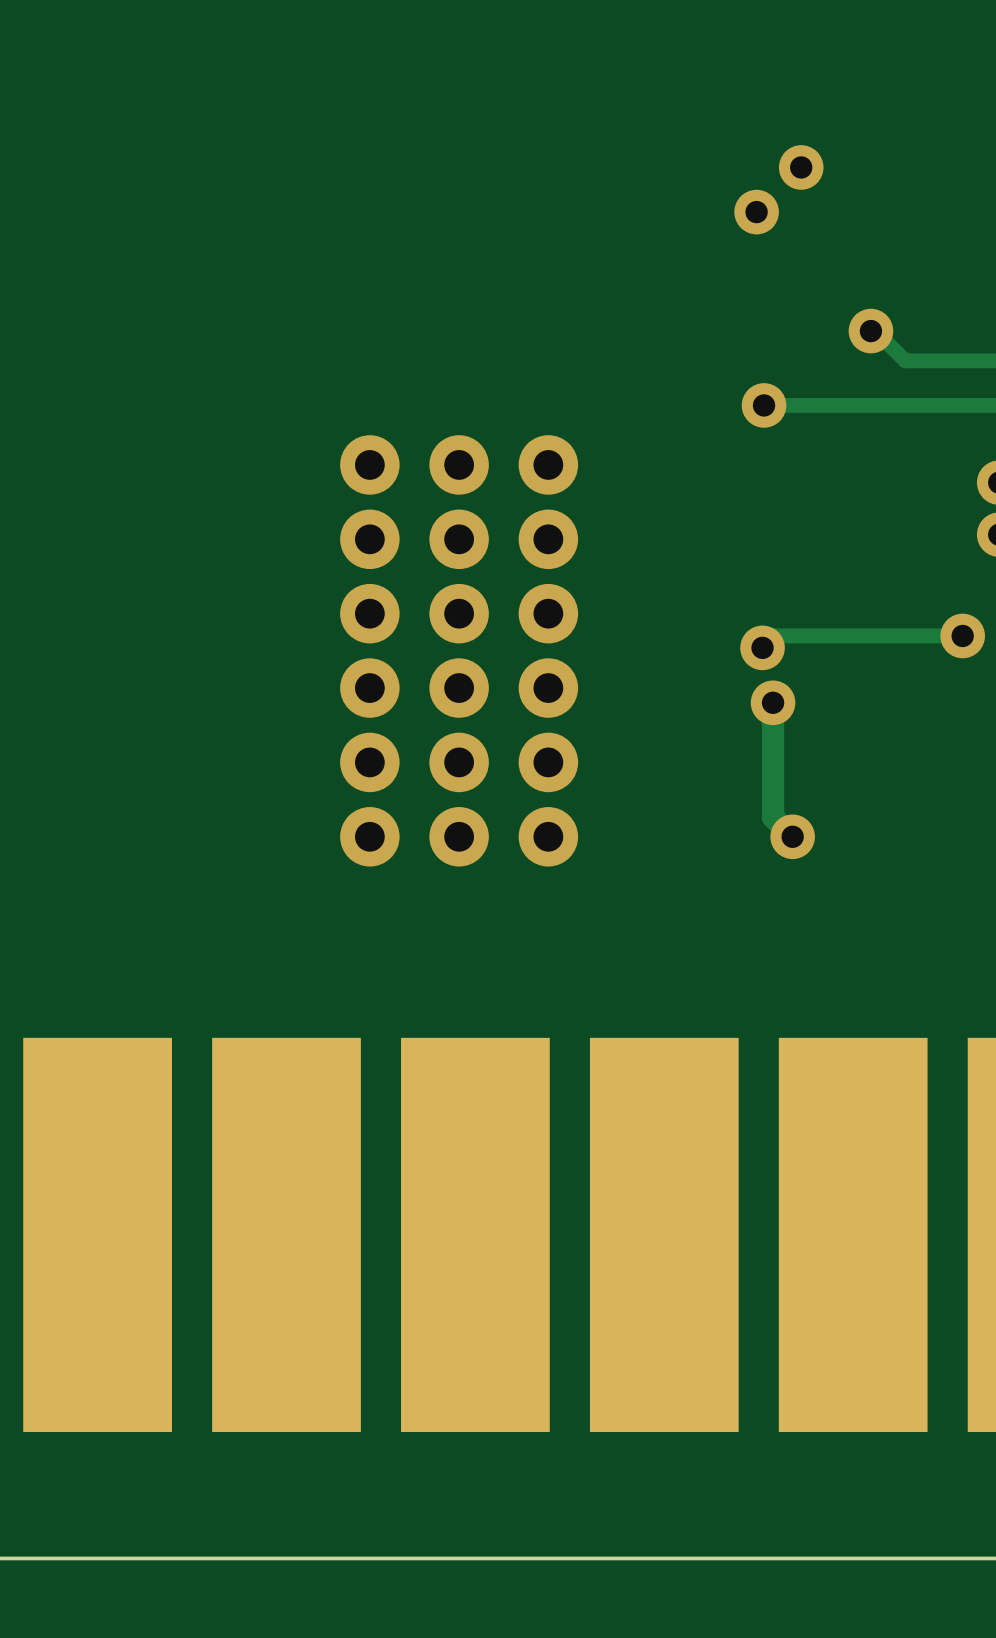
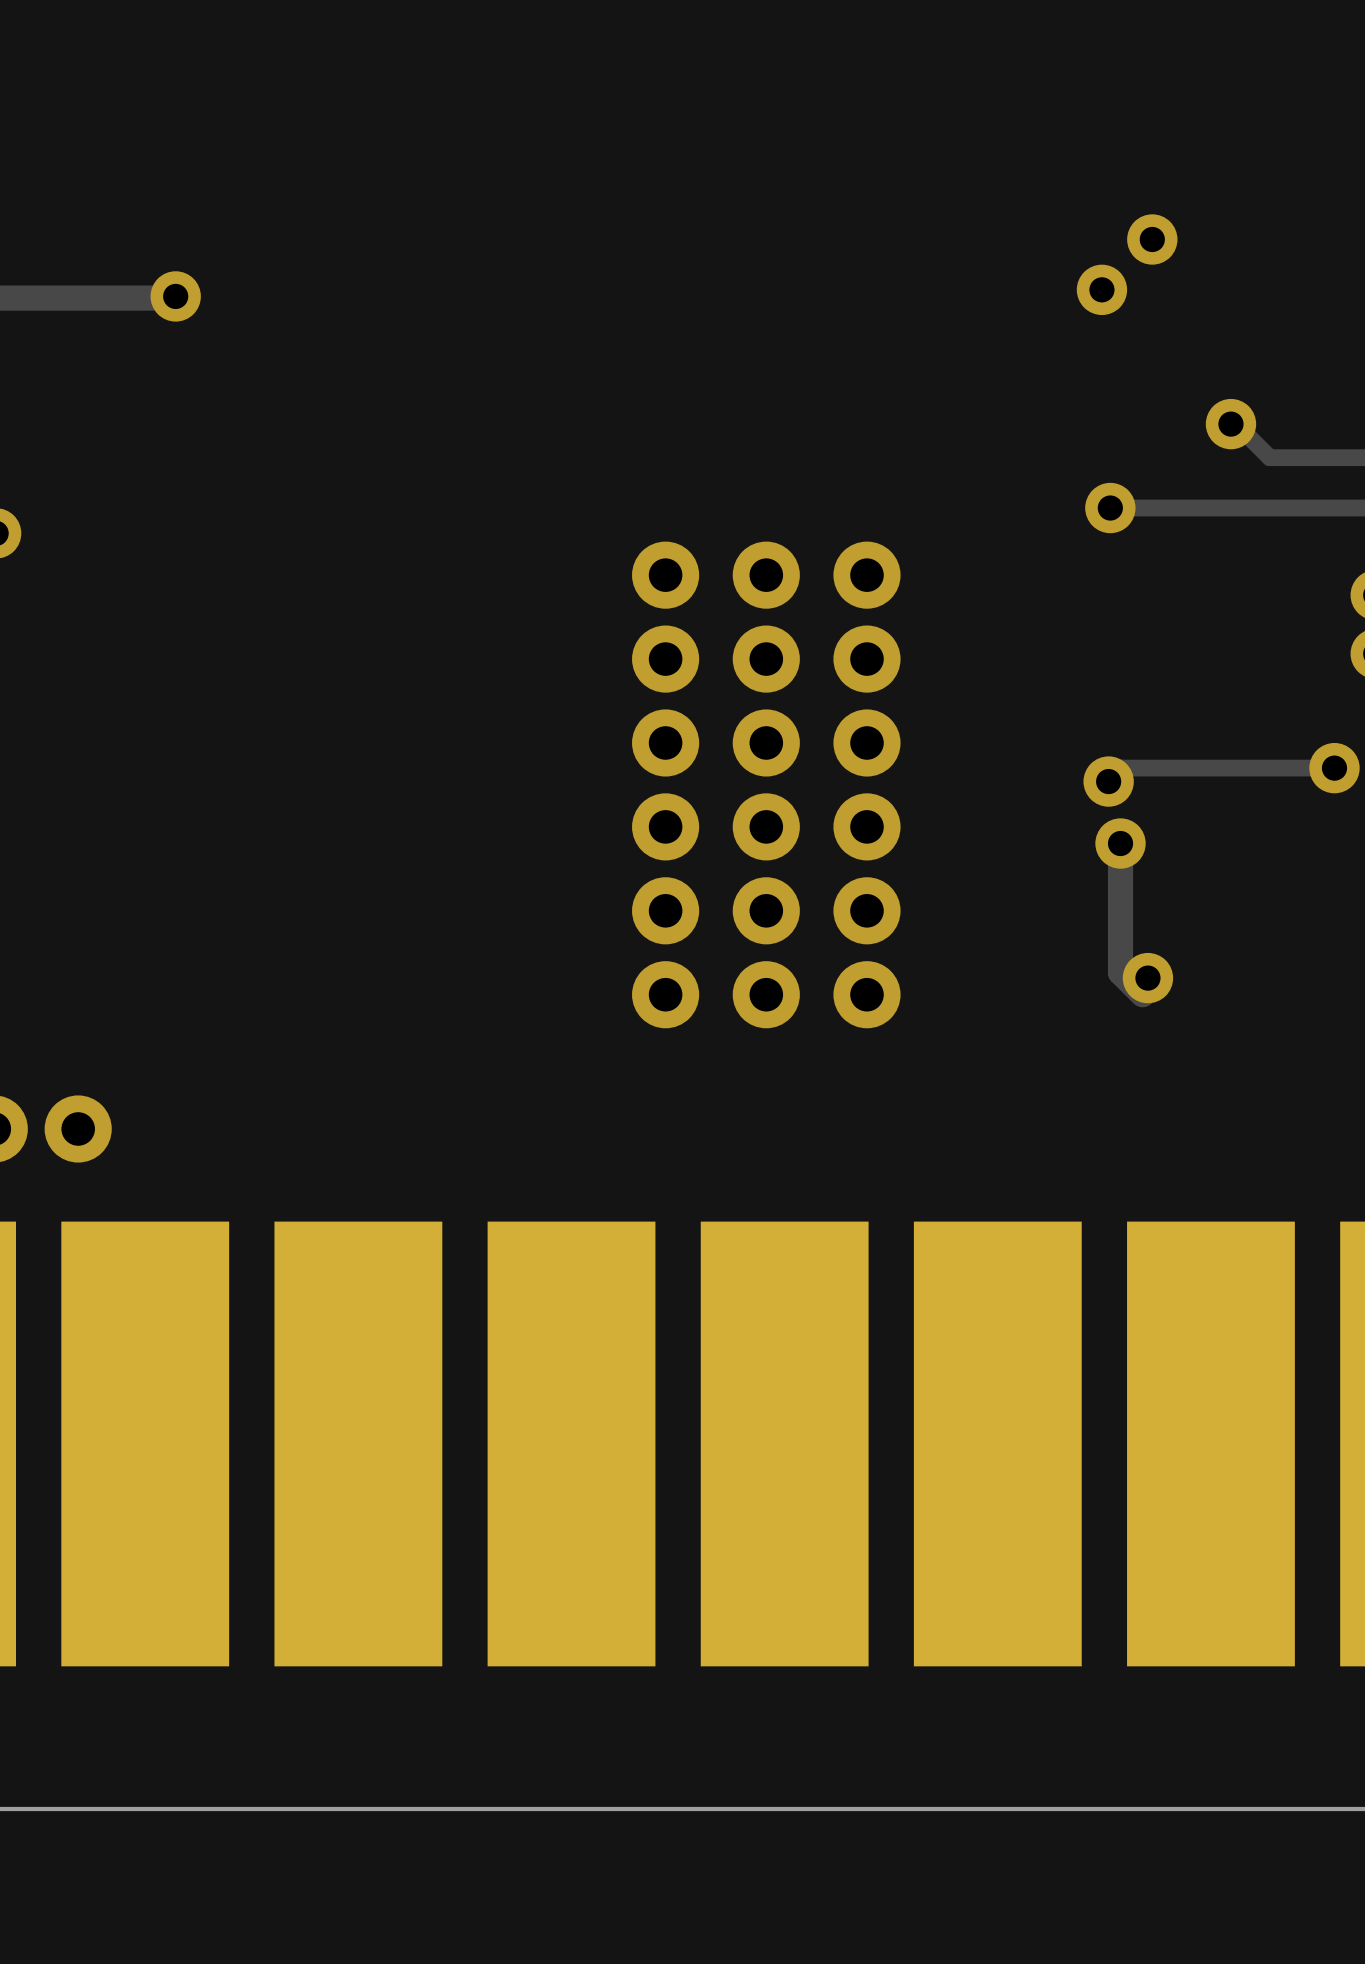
via position: (792, 836) -> (1147, 978)

